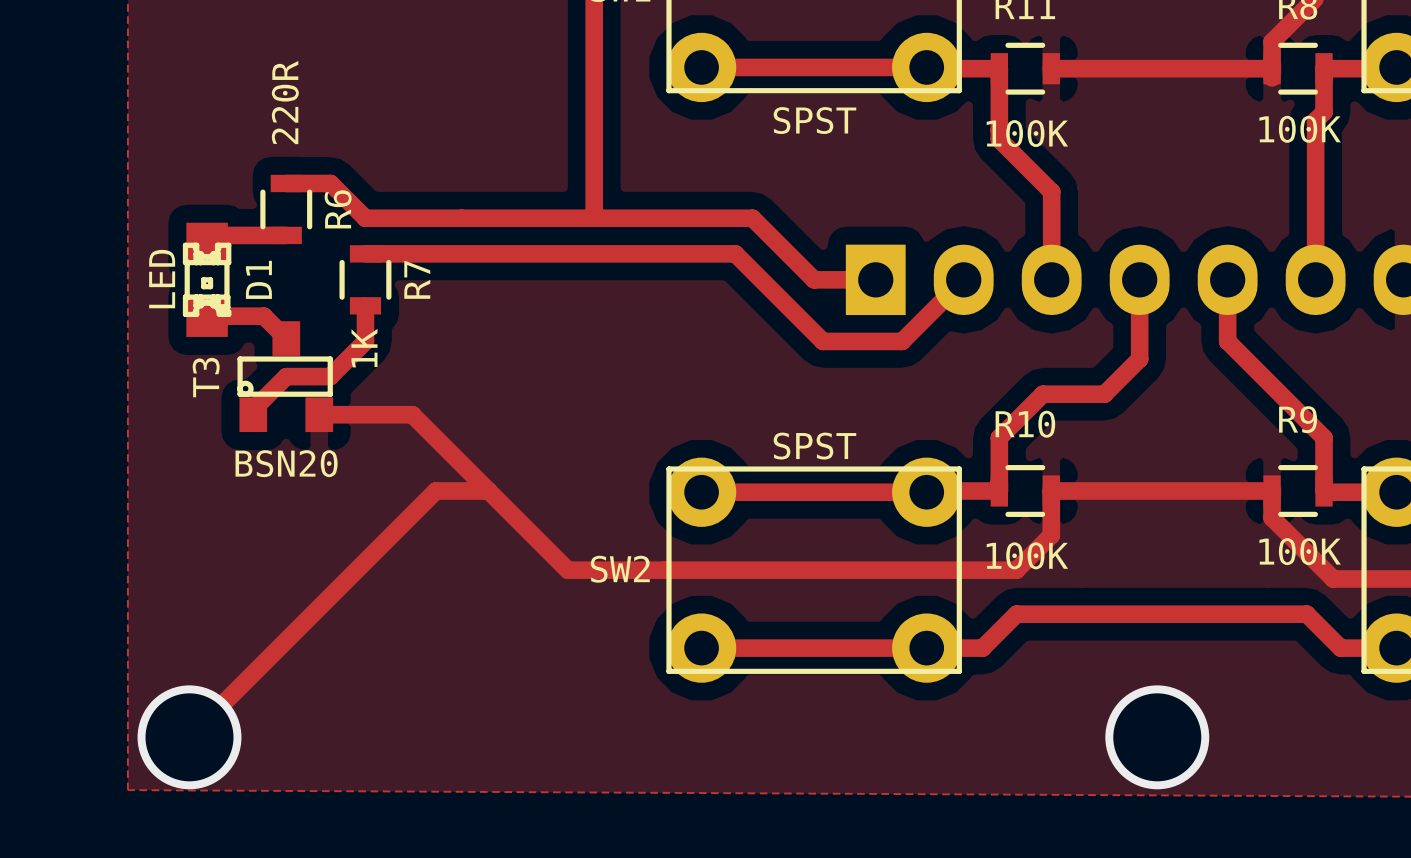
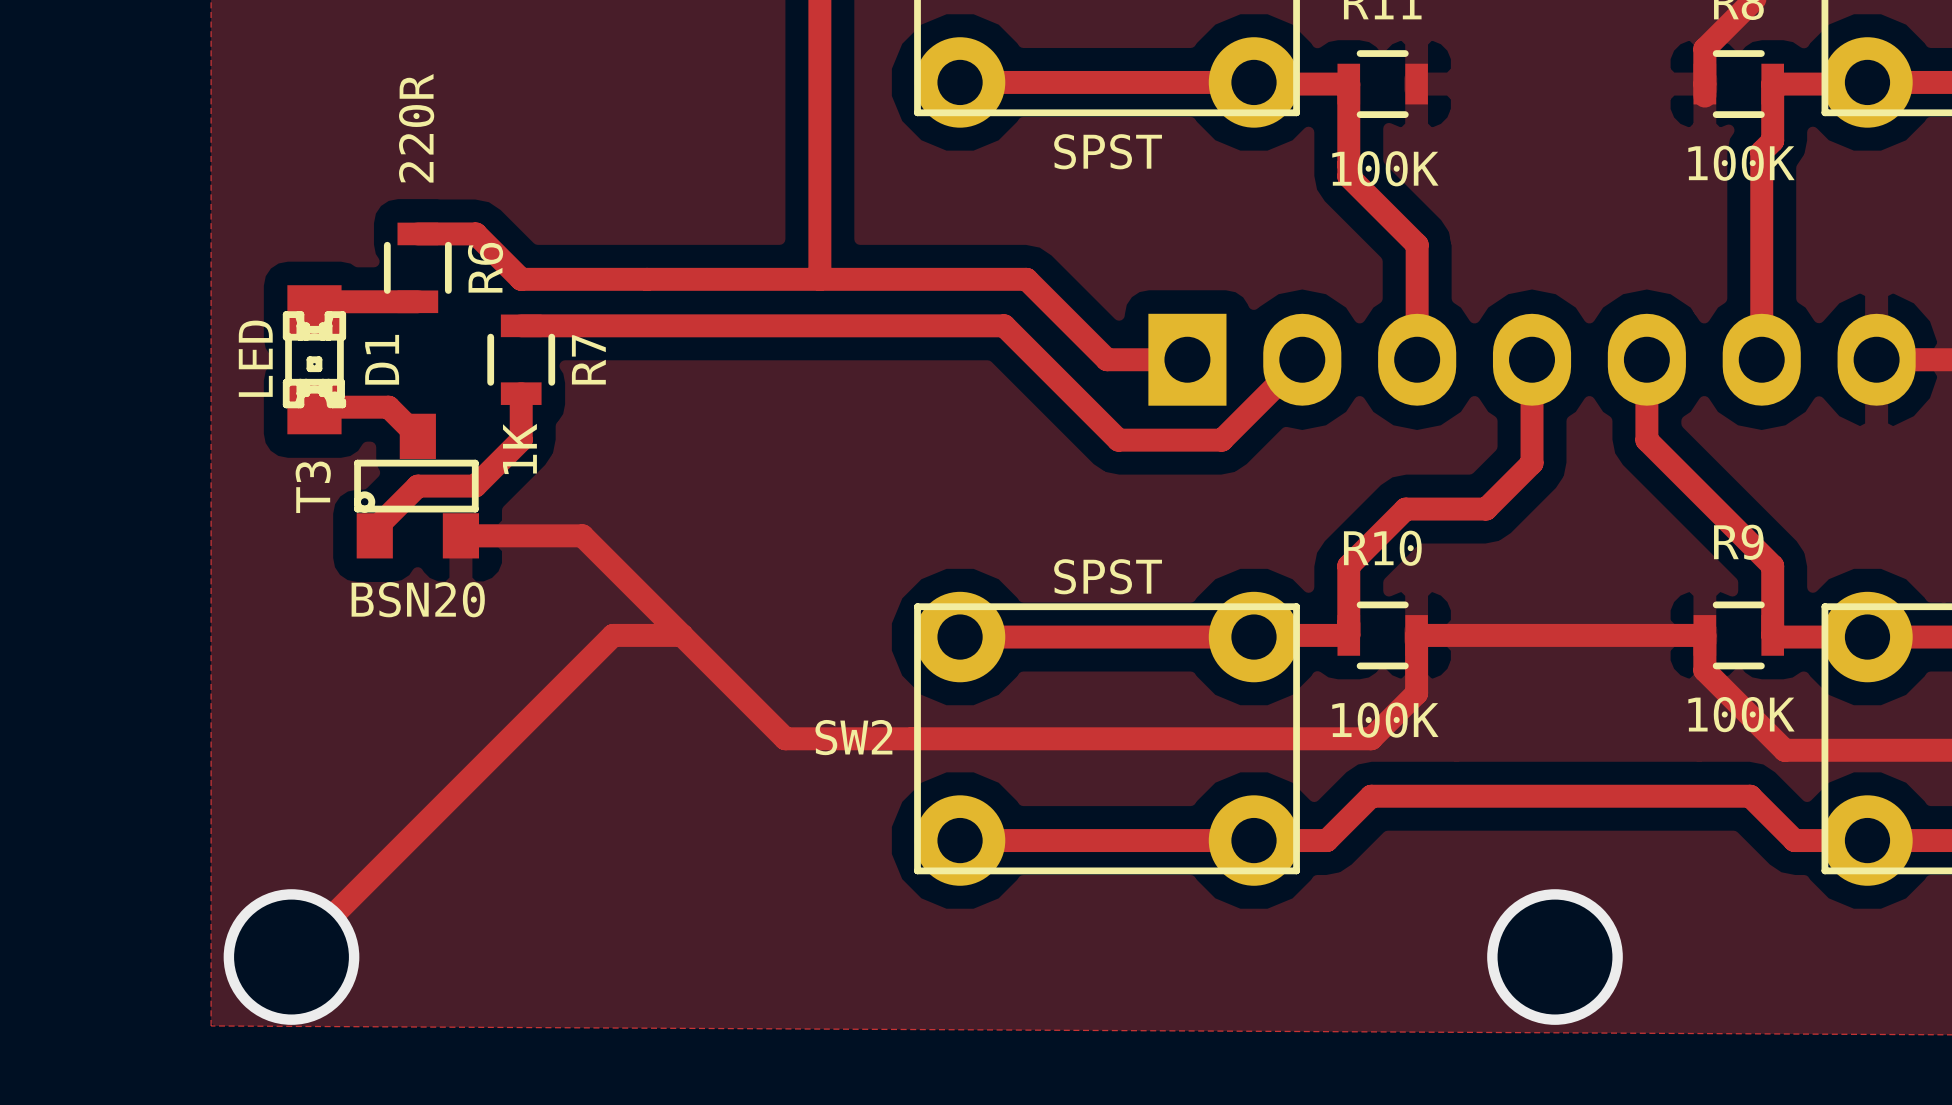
track: (1051, 68) (1272, 68) -> none

